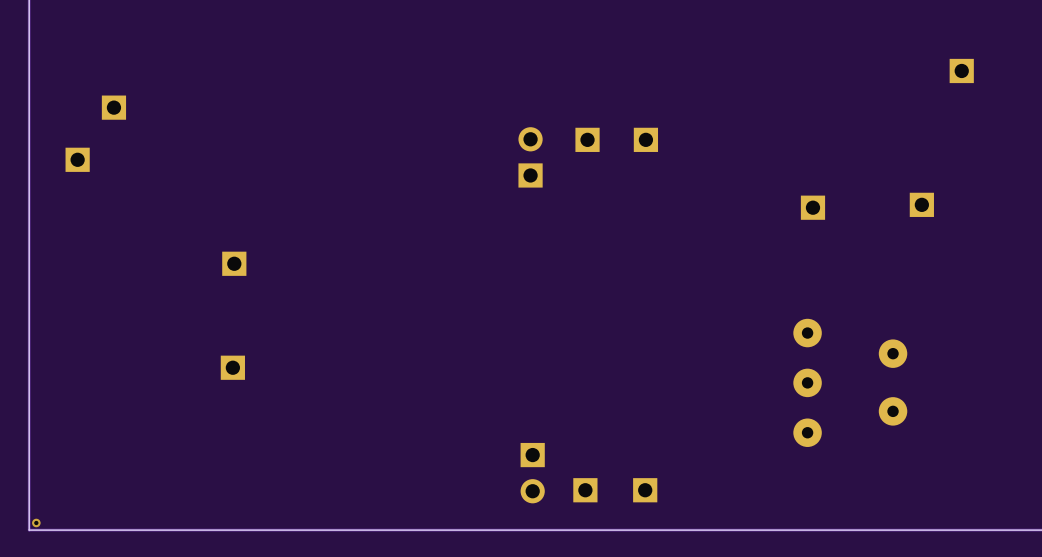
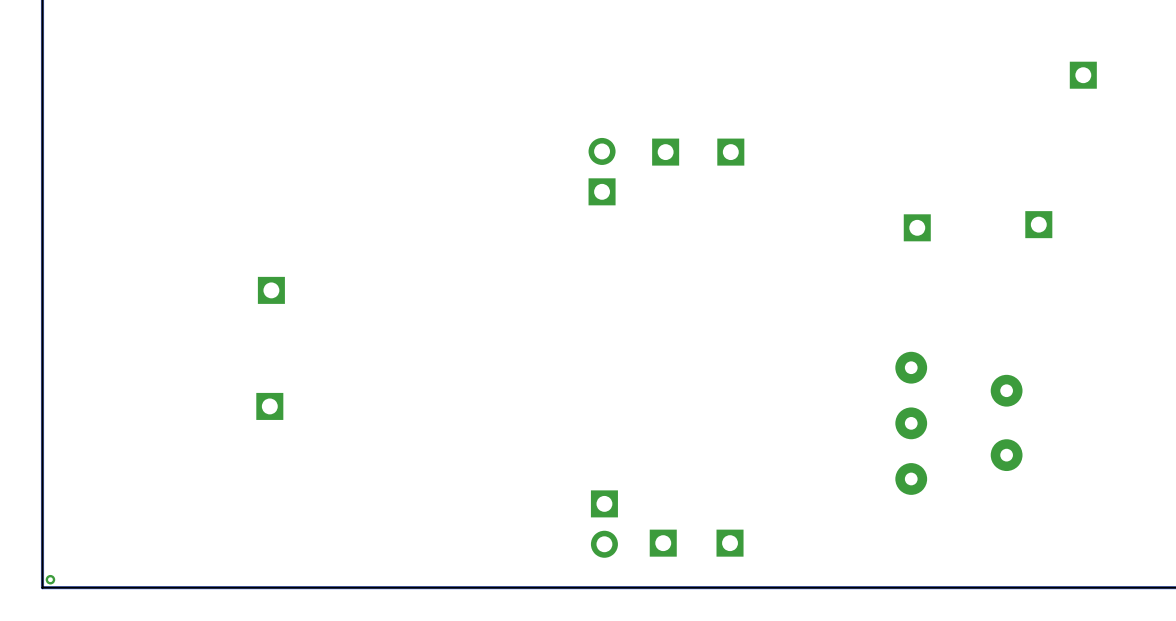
part: (113, 107) -> none
part: (77, 159) -> none

